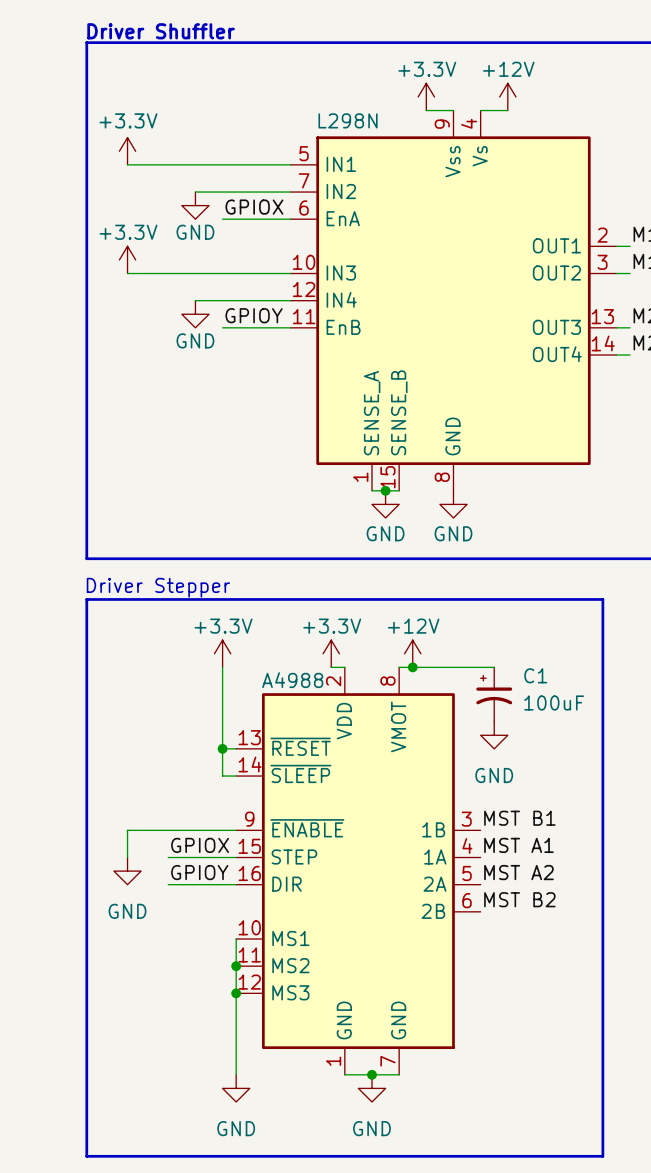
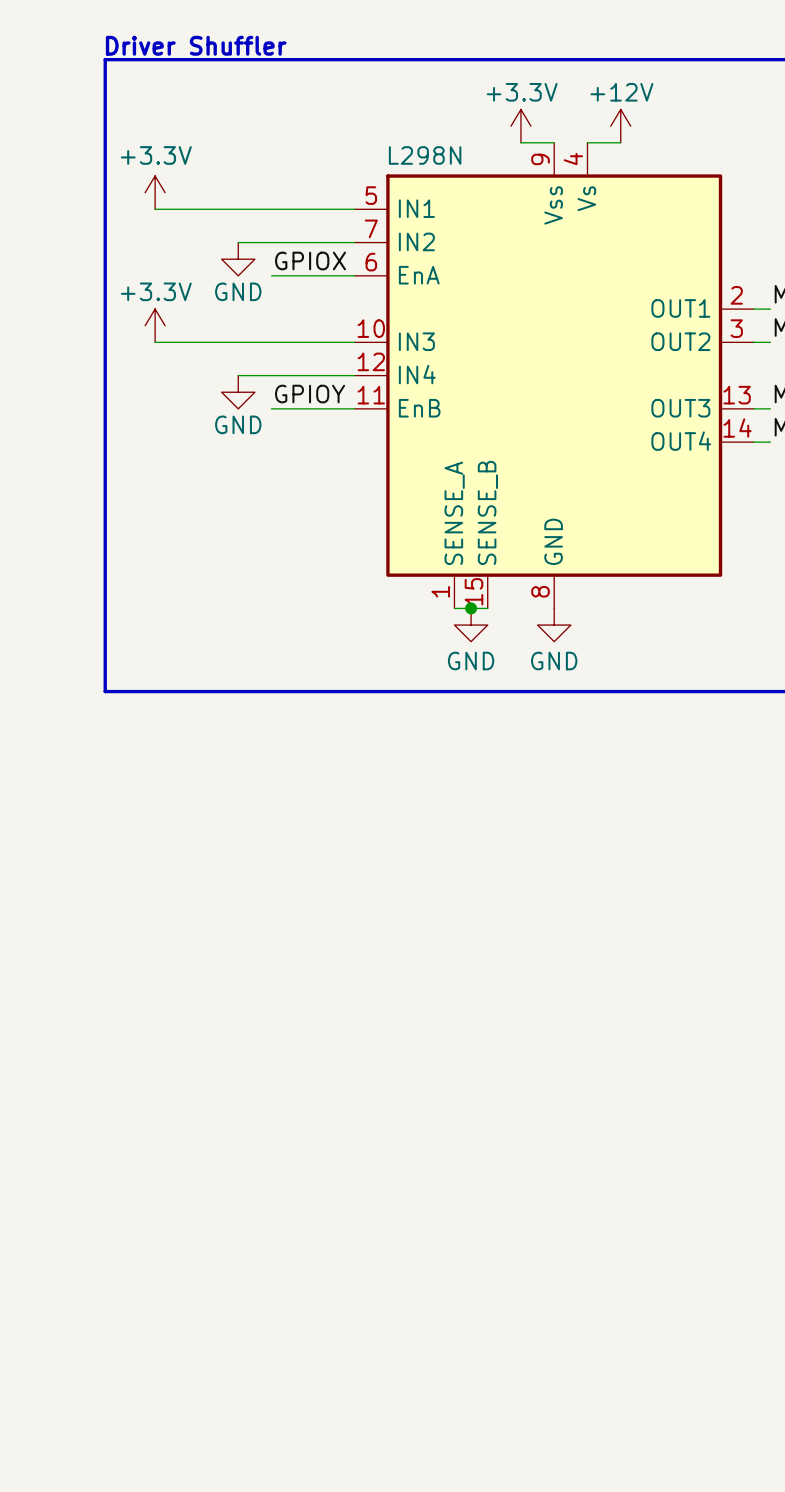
text: Driver Stepper (158, 587) -> none
line: (86, 599) (602, 599) (602, 1156) (86, 1156) (86, 599) -> none
power symbol: +3.3V (222, 653) -> none
power symbol: +3.3V (331, 653) -> none
power symbol: +12V (412, 653) -> none
wire: (222, 667) (222, 776) (236, 776) -> none
wire: (331, 667) (344, 667) -> none
wire: (399, 667) (494, 667) -> none
junction: (412, 667) -> none
C1: 100uF (494, 694) -> none
power symbol: GND (494, 735) -> none
wire: (222, 748) (236, 748) -> none
junction: (222, 748) -> none
label: MST B1 (519, 818) -> none
wire: (236, 830) (127, 830) (127, 857) -> none
label: GPIOX (200, 845) -> none
label: MST A1 (518, 845) -> none
wire: (168, 857) (236, 857) -> none
power symbol: GND (127, 871) -> none
part: A4988 (358, 871) -> none
label: GPIOY (199, 872) -> none
label: MST A2 (518, 872) -> none
wire: (168, 884) (236, 884) -> none
label: MST B2 (519, 899) -> none
wire: (236, 939) (236, 1074) -> none
junction: (236, 966) -> none
junction: (236, 993) -> none
wire: (344, 1074) (399, 1074) -> none
junction: (371, 1074) -> none
power symbol: GND (236, 1088) -> none
power symbol: GND (371, 1088) -> none

